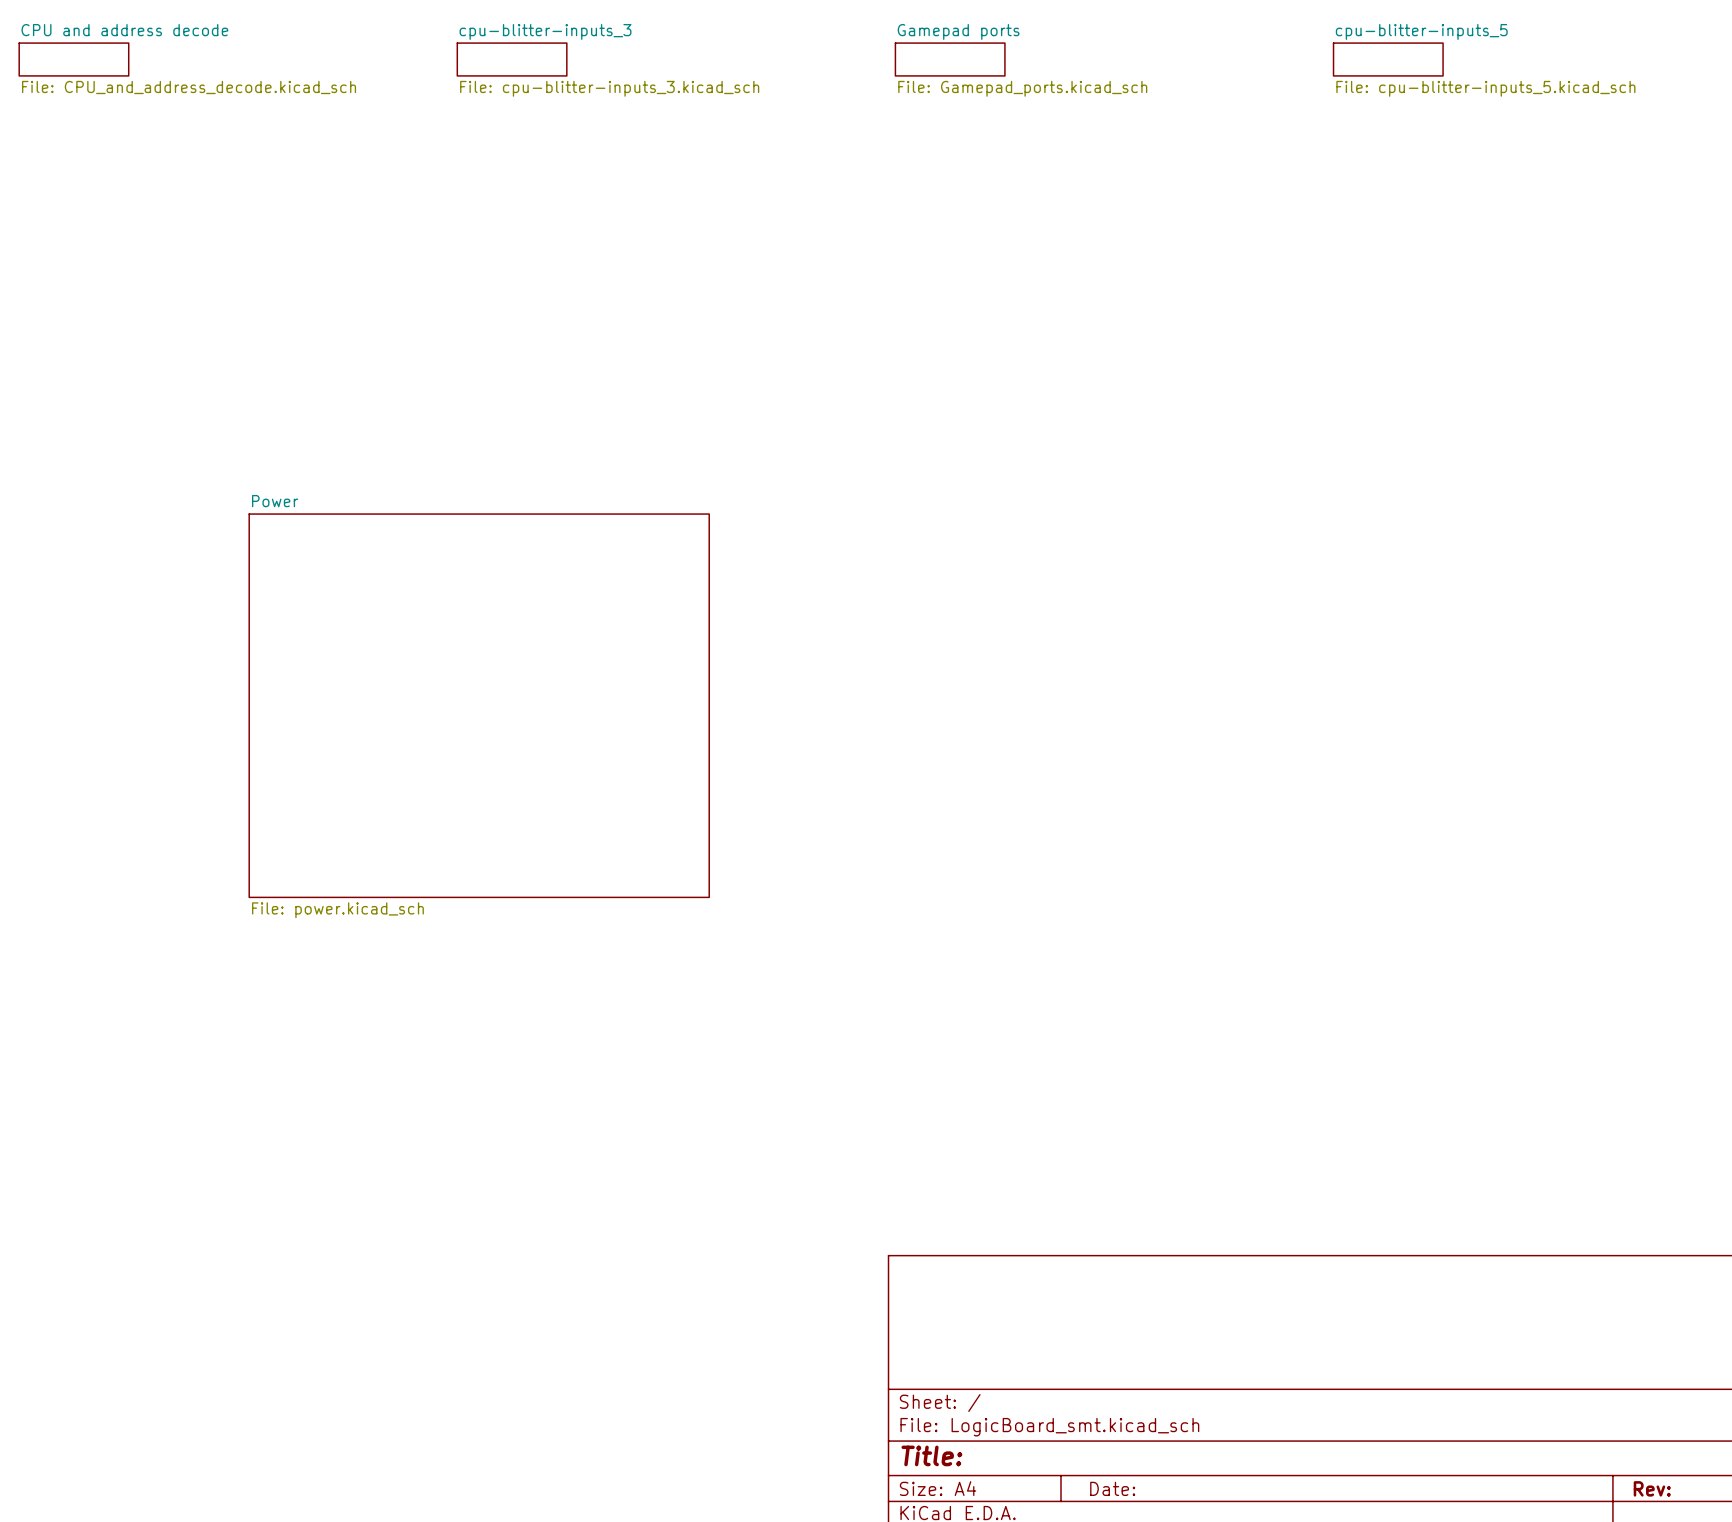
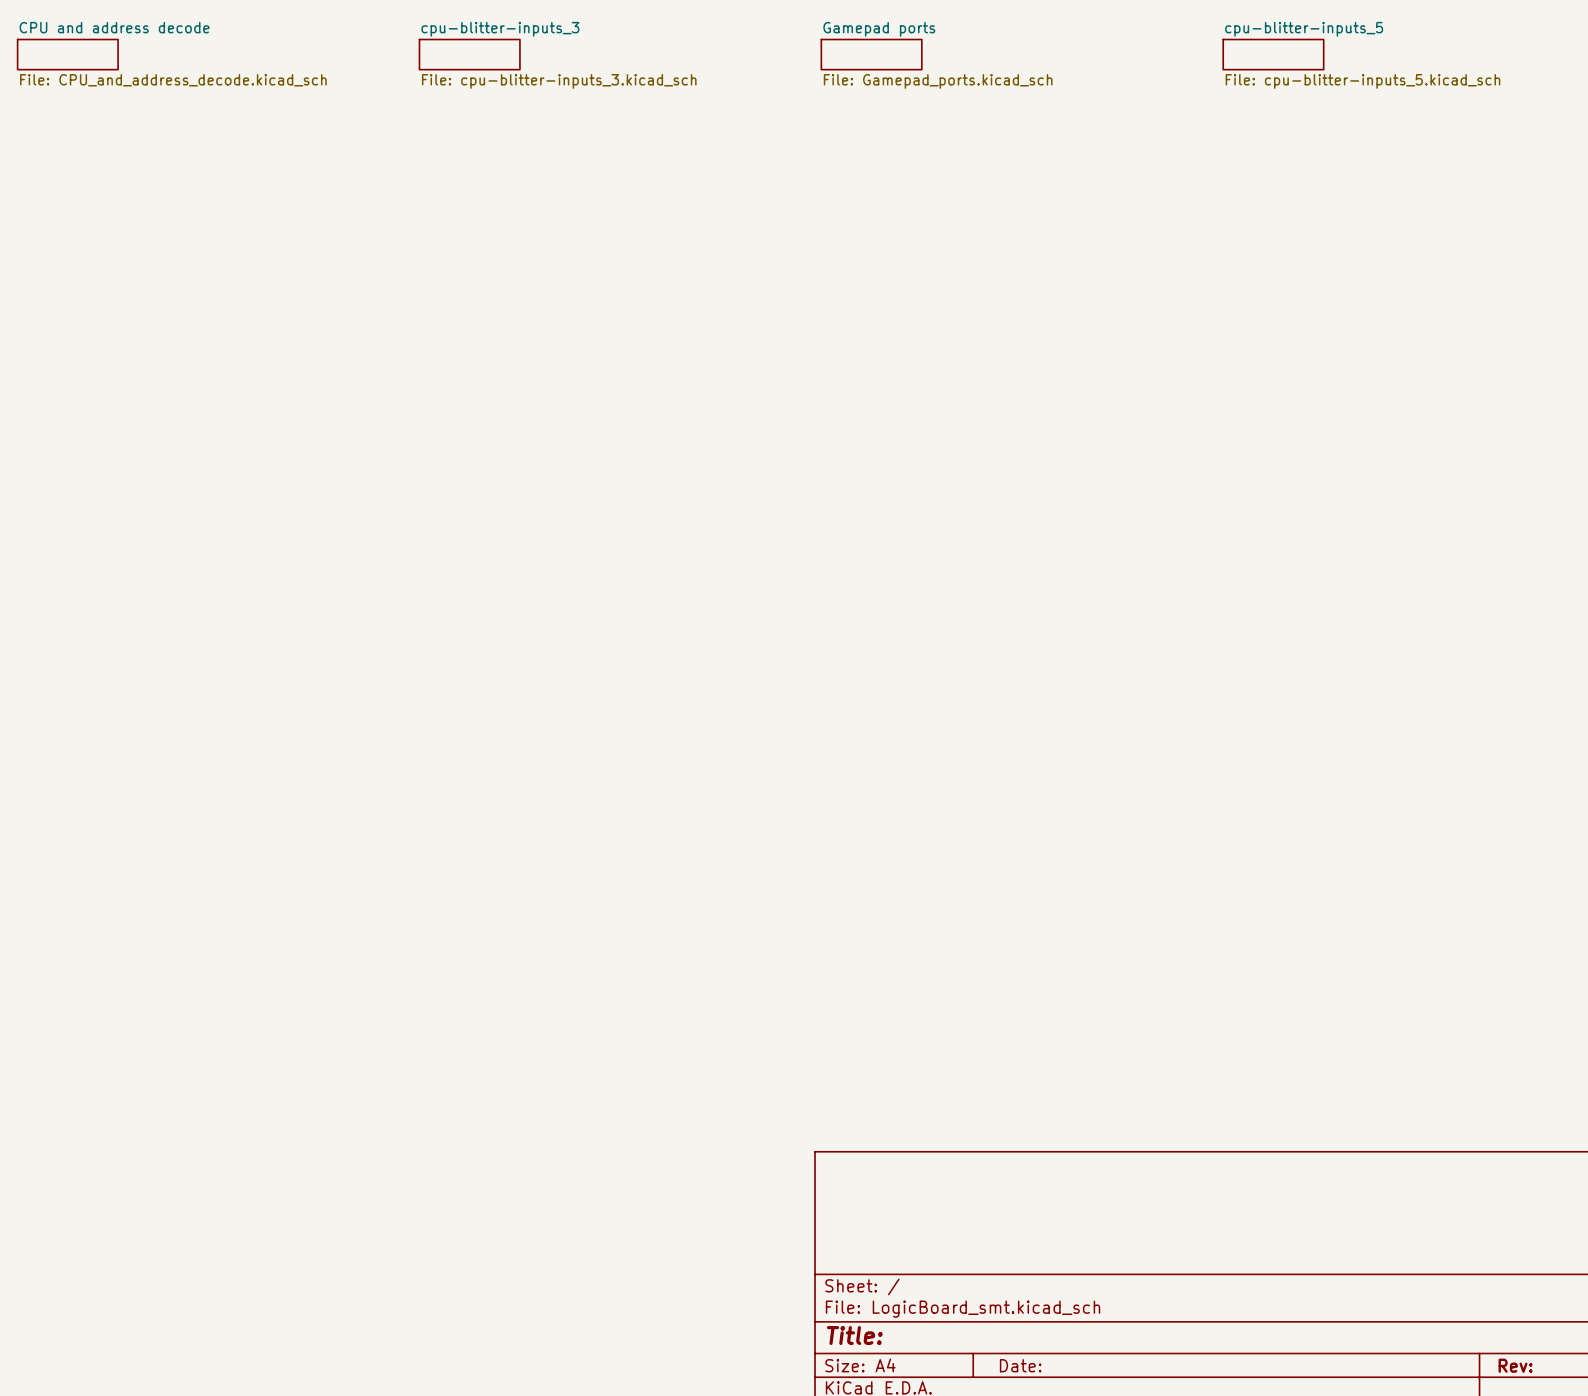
sheet Power: File: power.kicad_sch (479, 705) -> none

